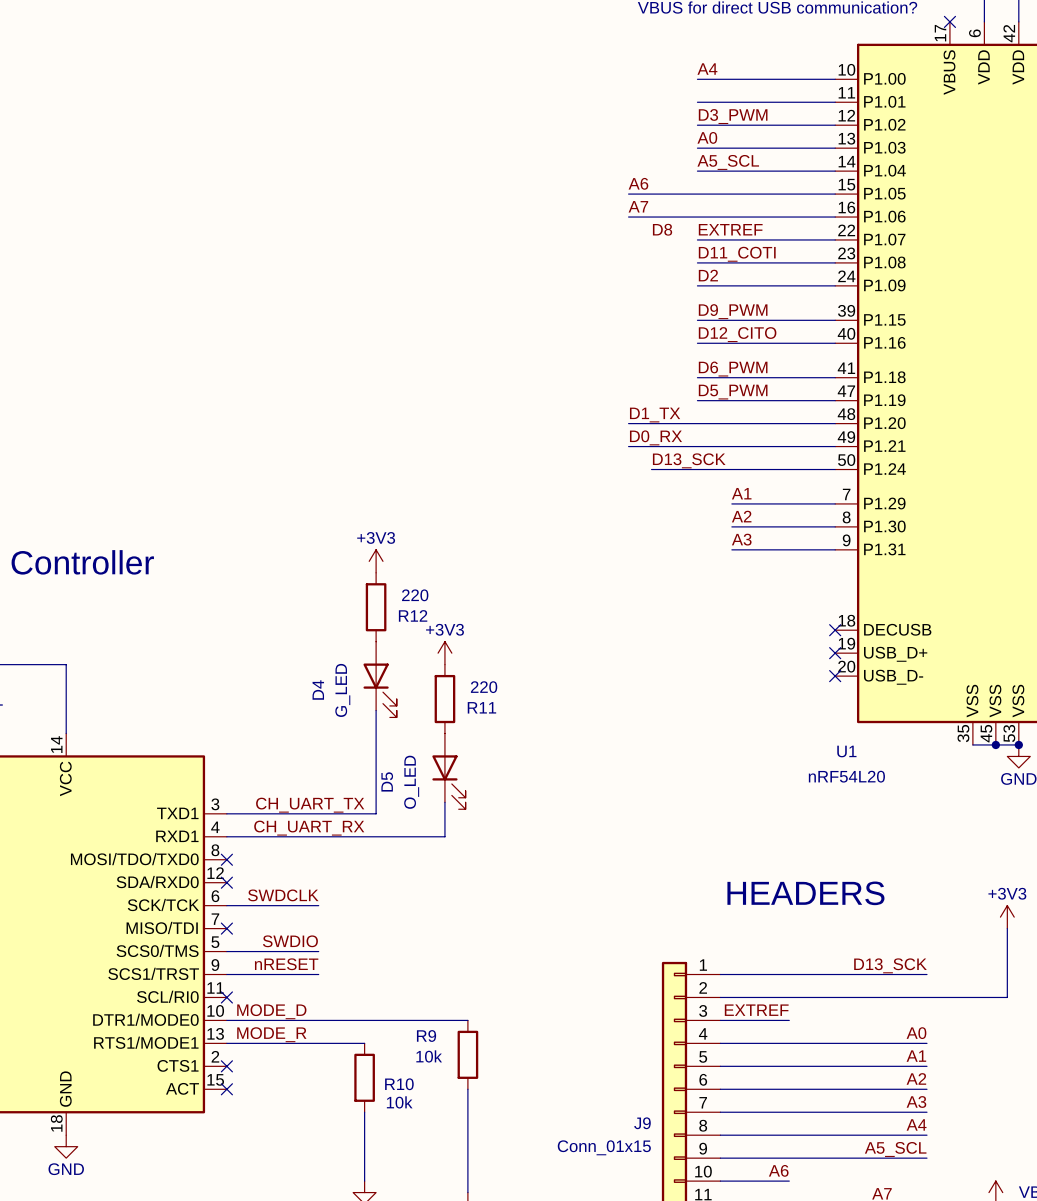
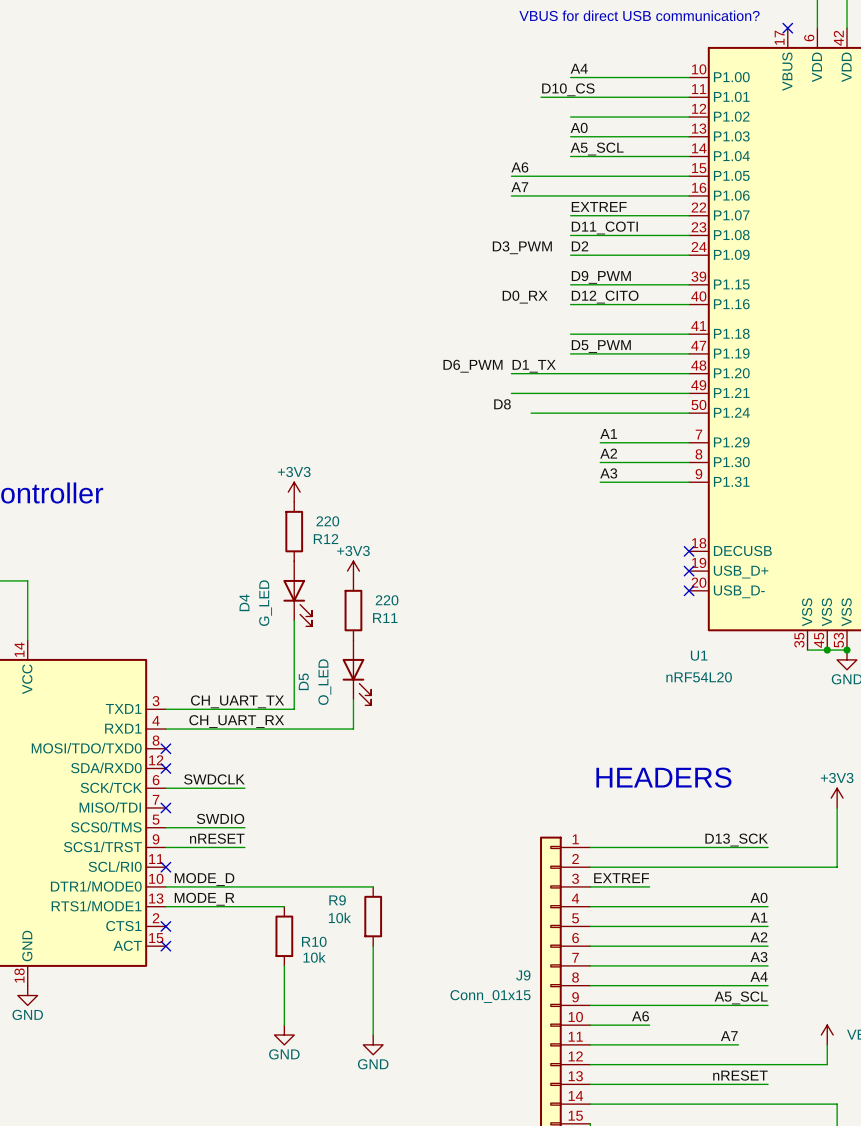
label: none -> D10_CS (568, 89)
wire: none -> (541, 97) (570, 97)
label position: D3_PWM (733, 116) -> D3_PWM (522, 247)
label: D8 (662, 229) -> none
label position: D6_PWM (733, 369) -> D6_PWM (472, 366)
label position: D0_RX (655, 437) -> D0_RX (525, 297)
label: none -> D8 (502, 404)
label: D13_SCK (689, 460) -> none

